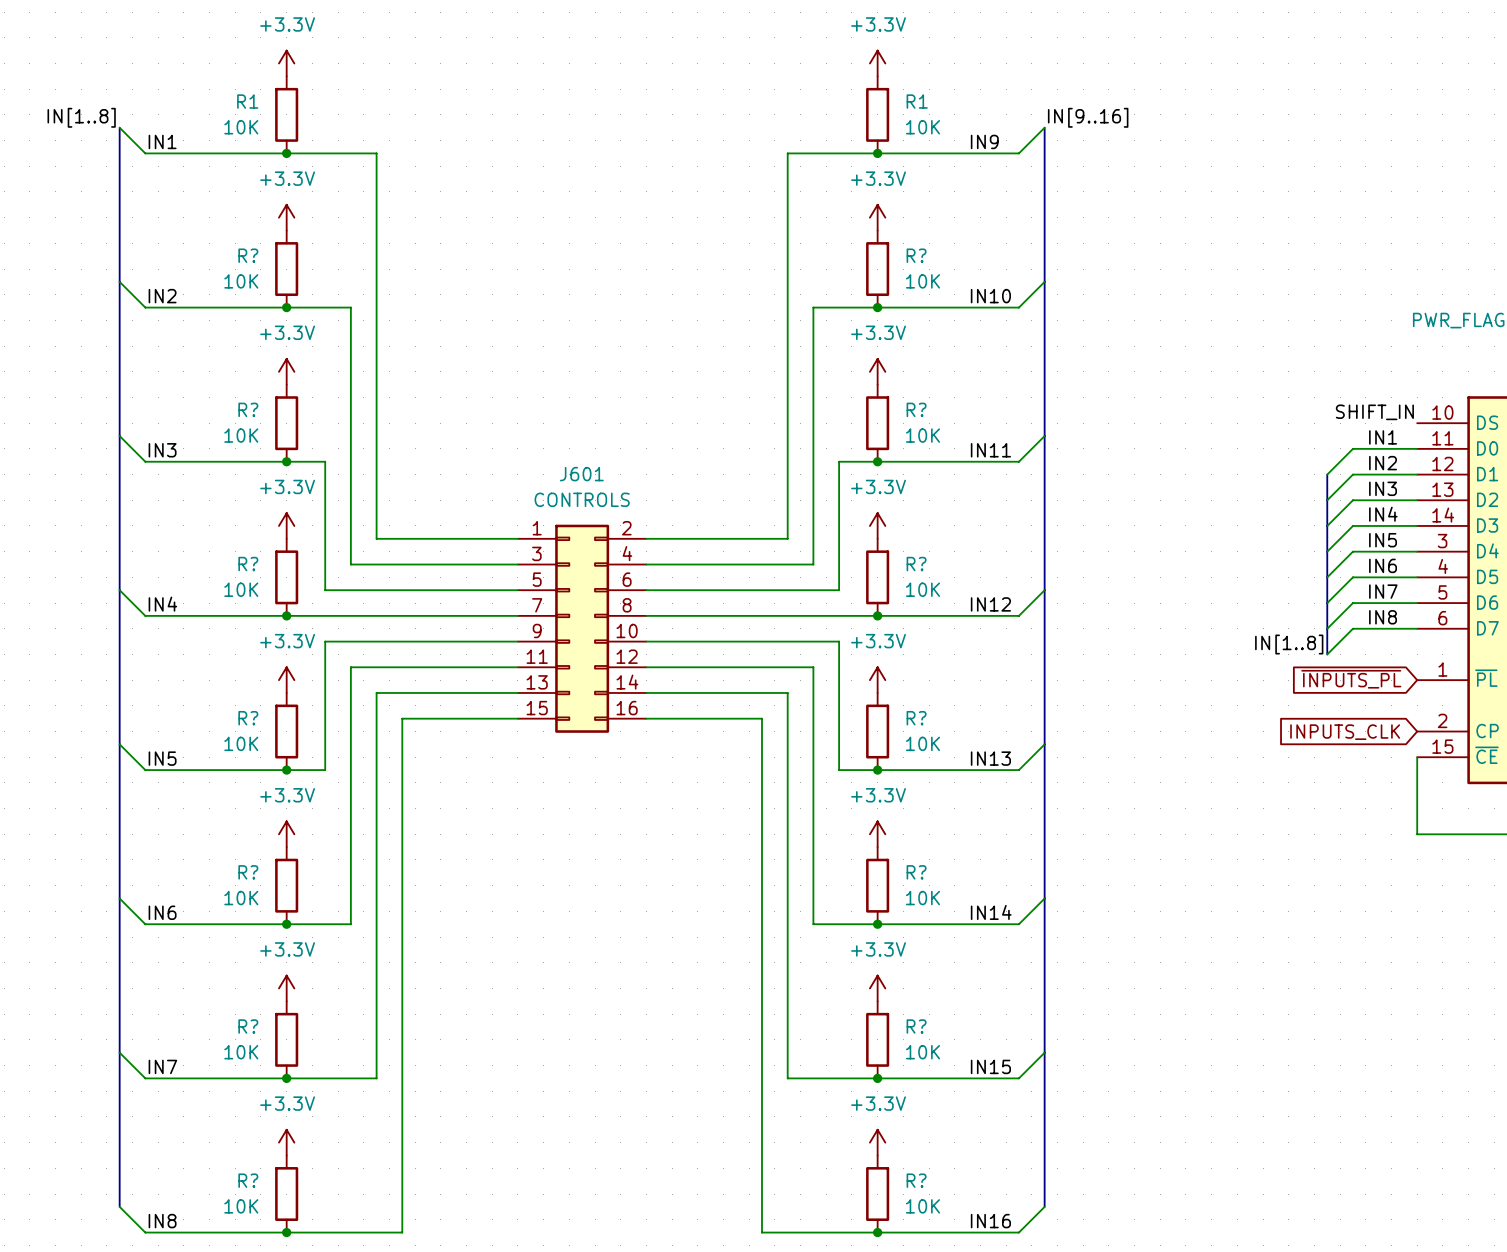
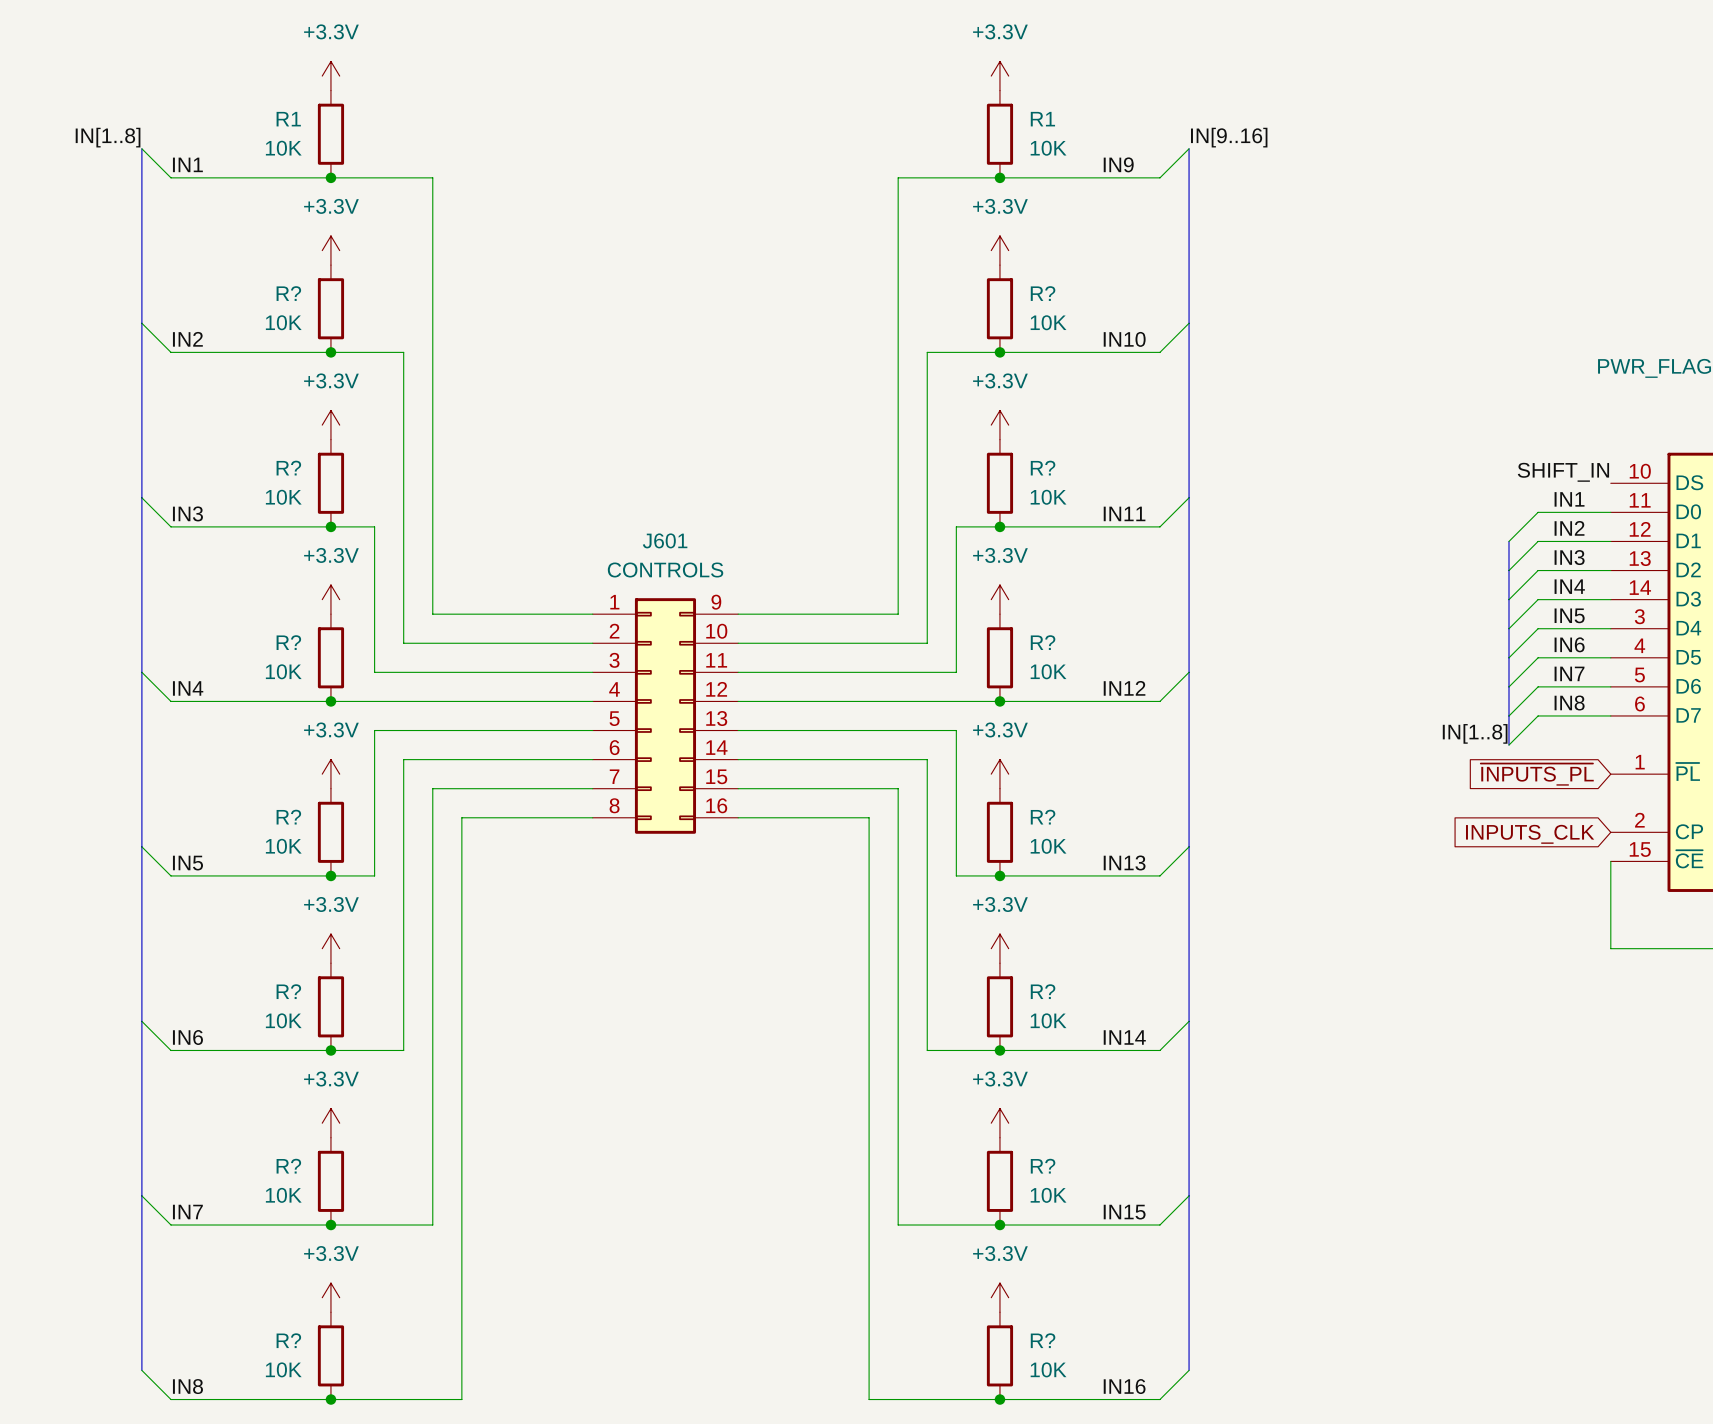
J601 symbol: [517, 524, 647, 733] -> [592, 598, 739, 834]

